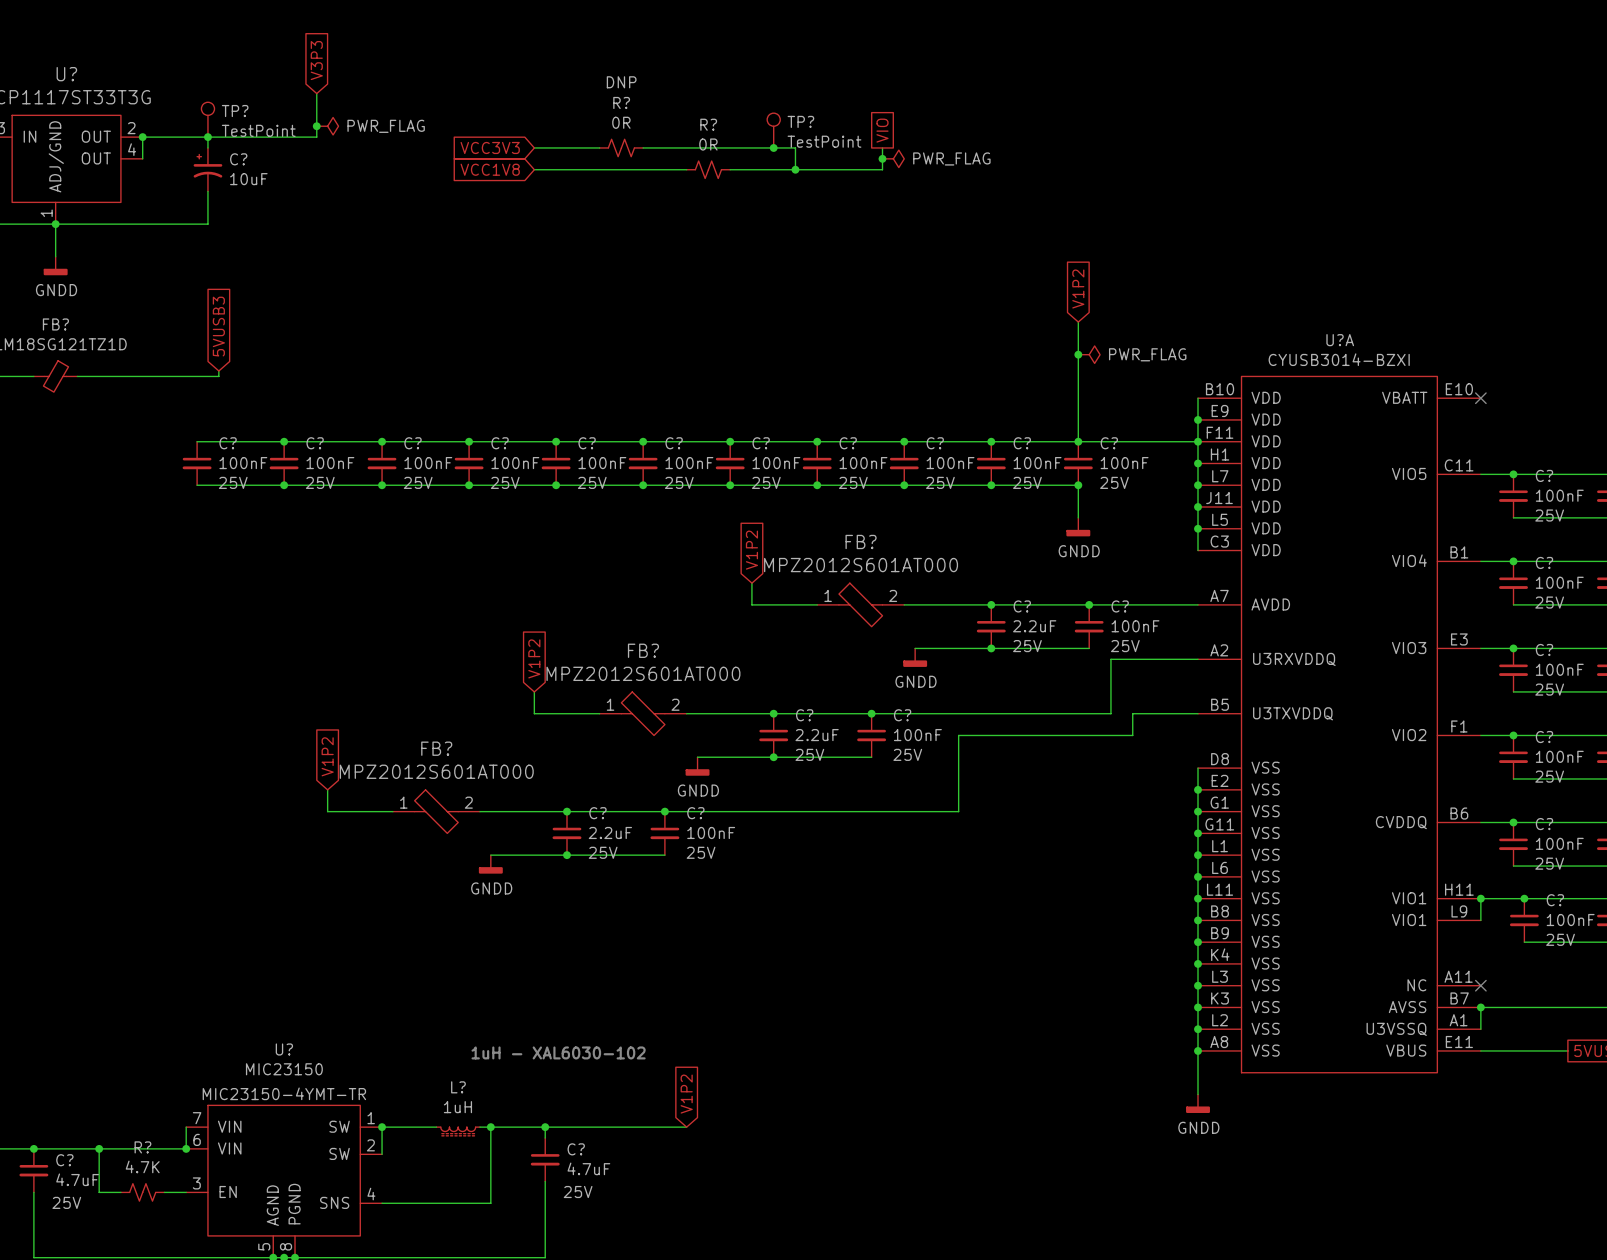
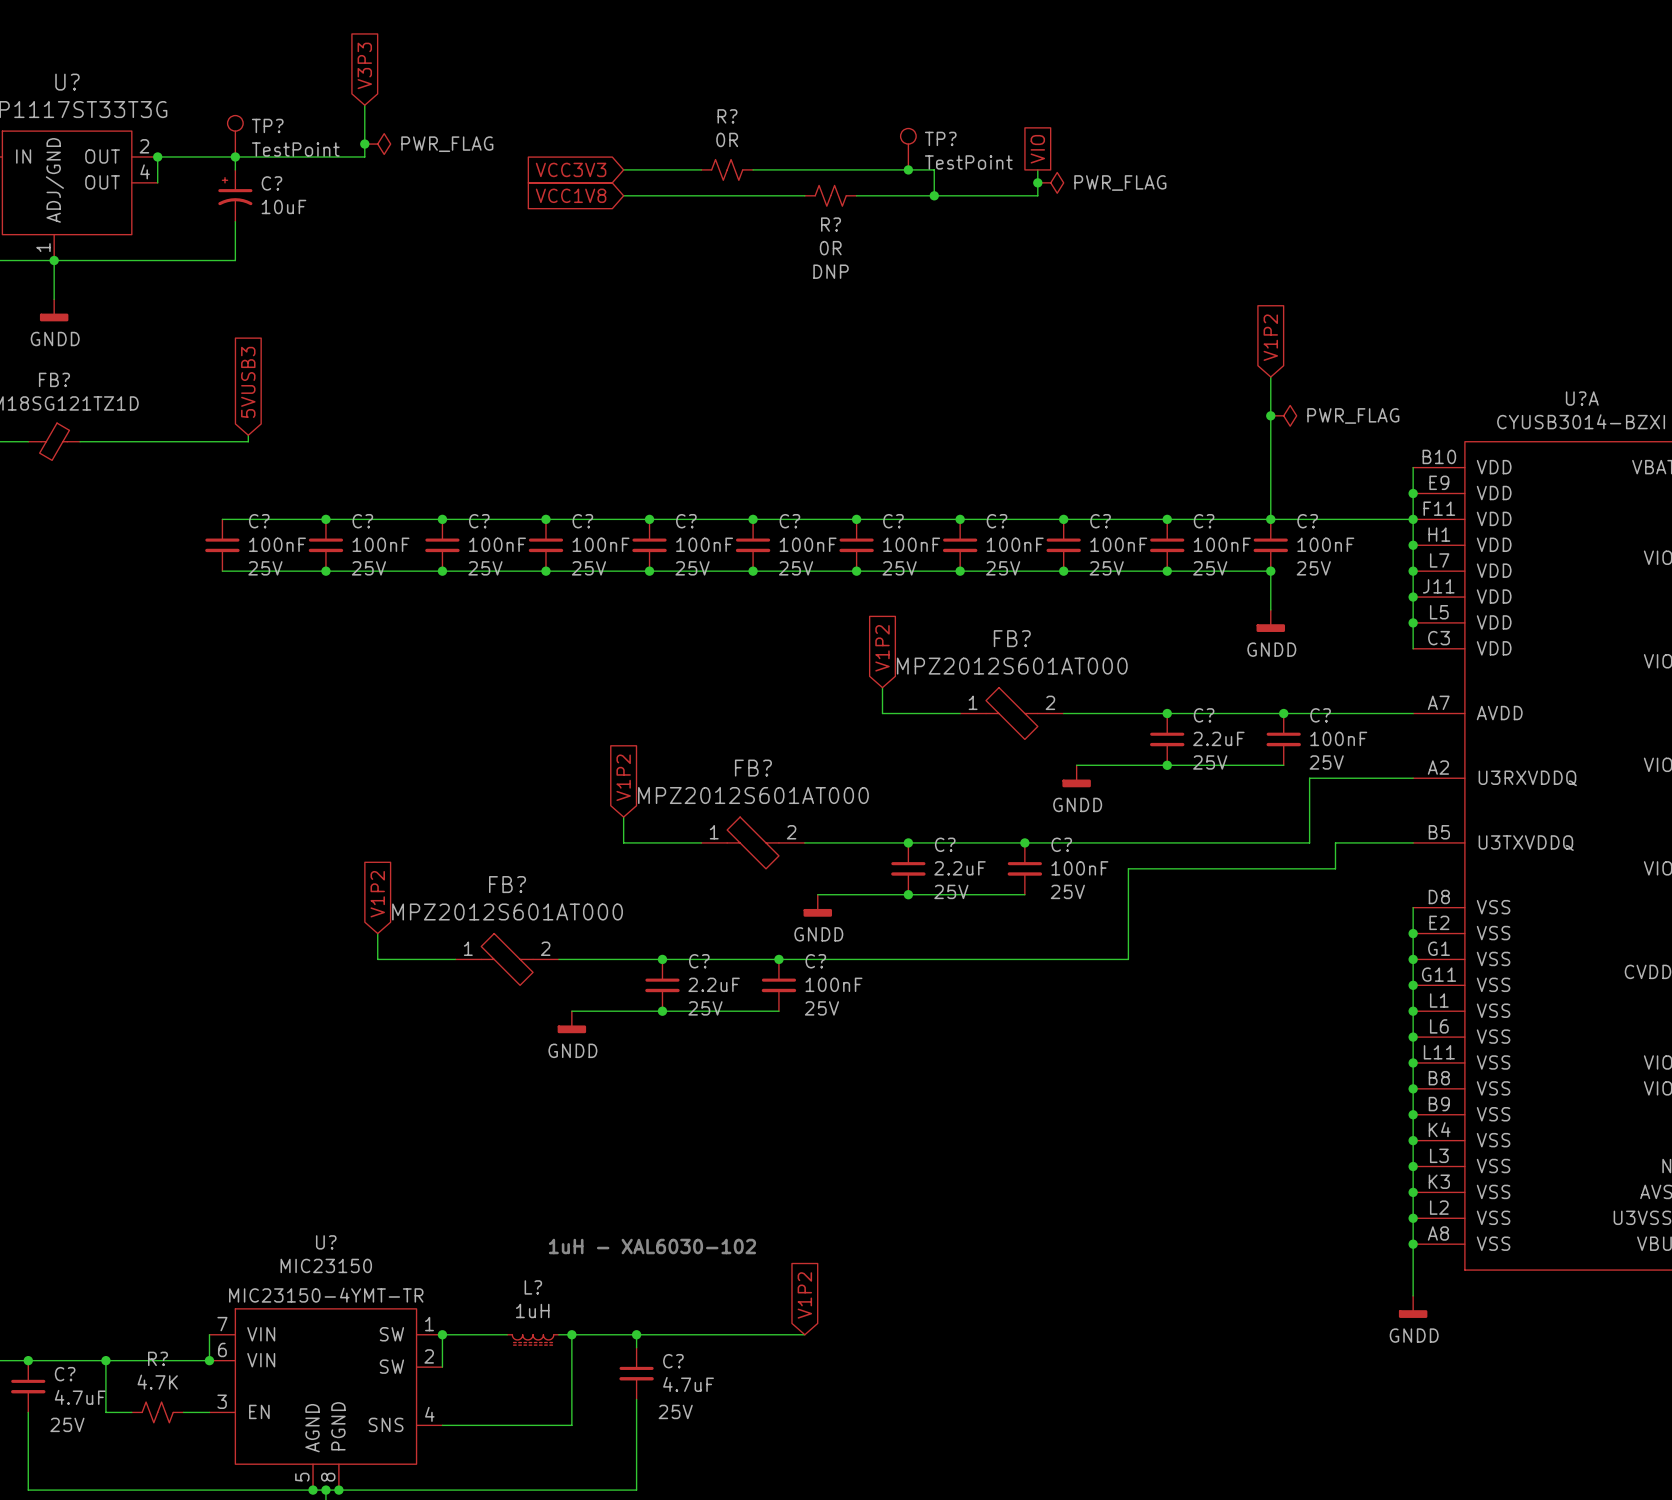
R? text: DNP (621, 82) -> none
R? name position: R? (708, 124) -> R? (831, 224)
R? value position: 0R (708, 144) -> 0R (830, 248)
R? text: none -> DNP (831, 271)

